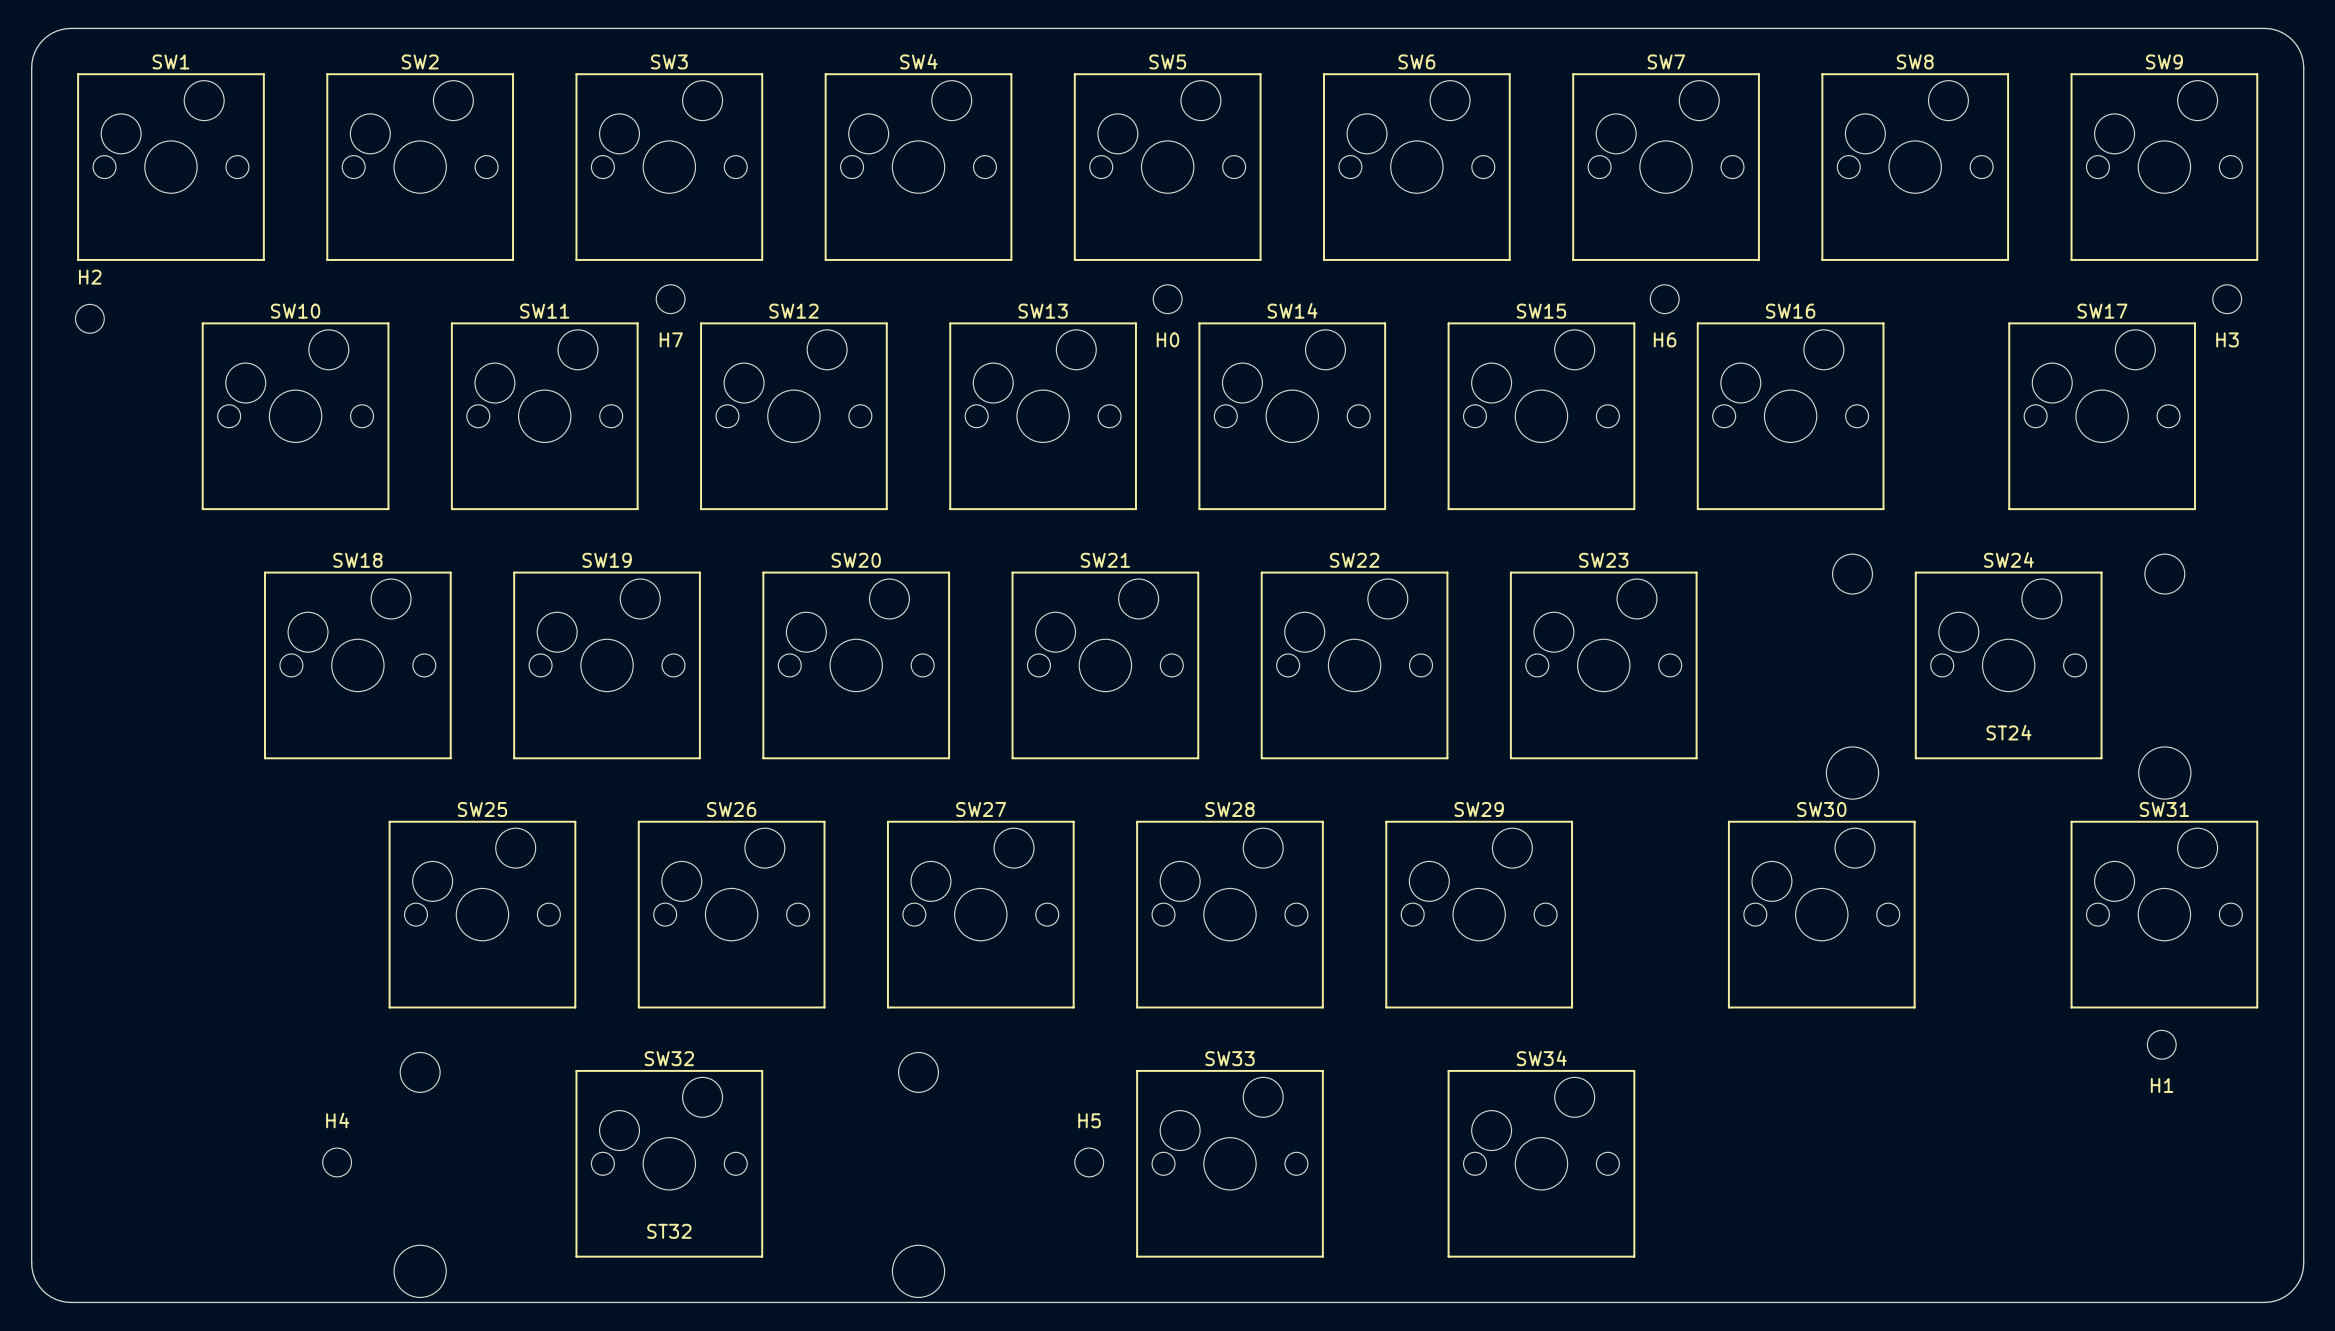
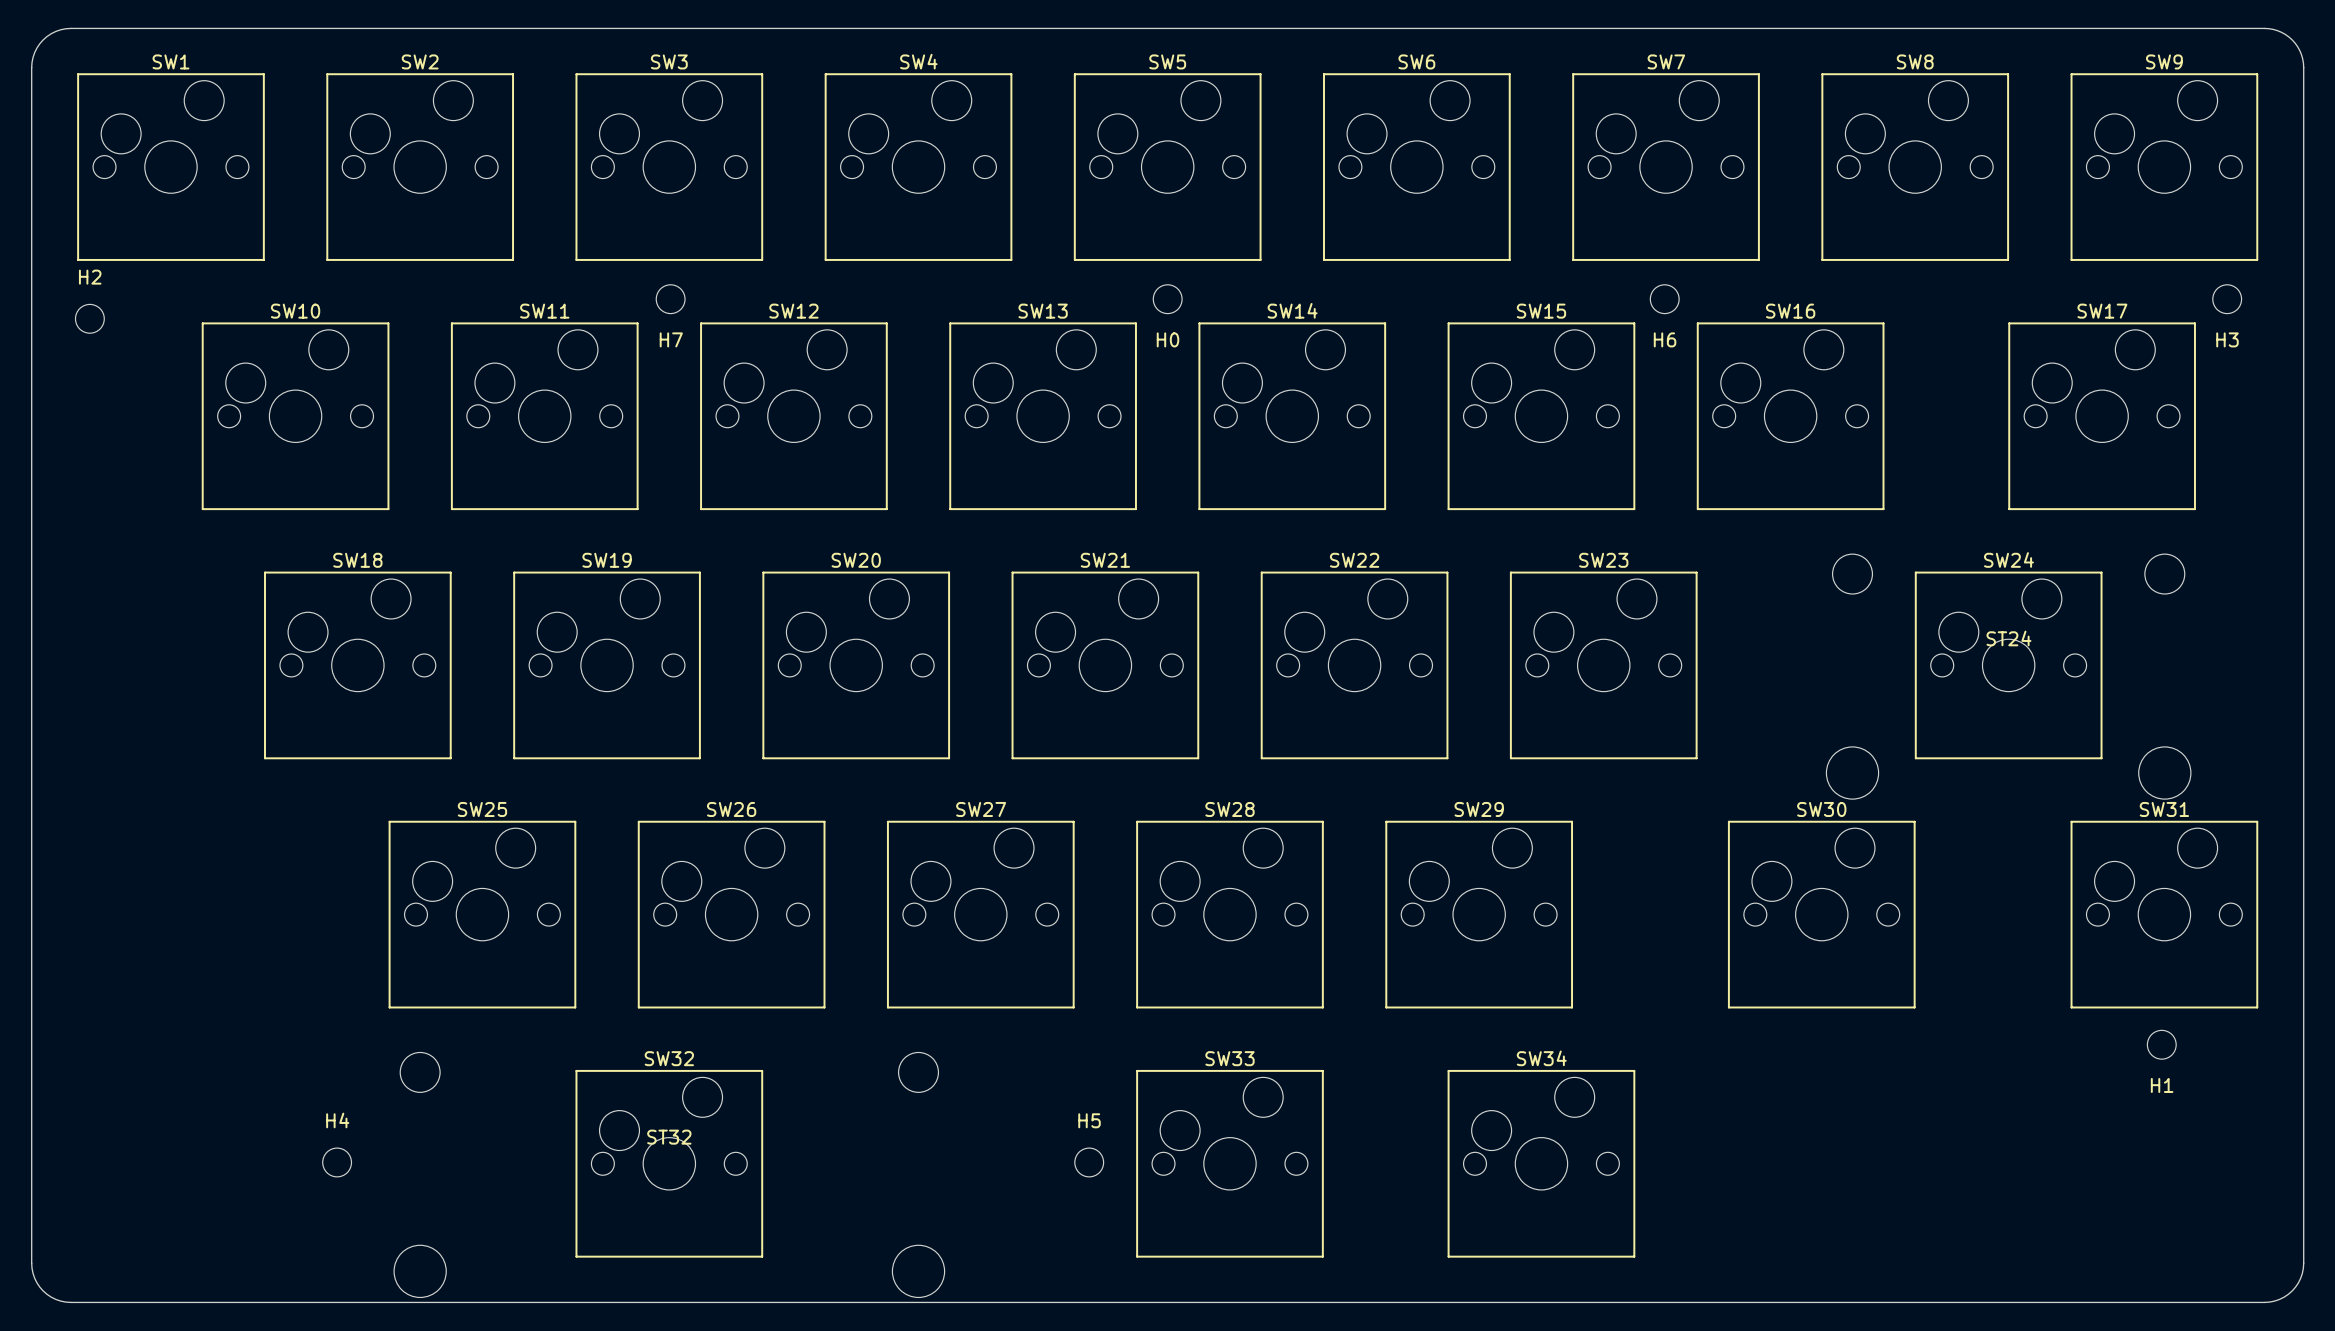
ST24 name position: ST24 (2008, 732) -> ST24 (2008, 638)
ST32 name position: ST32 (669, 1231) -> ST32 (669, 1137)

